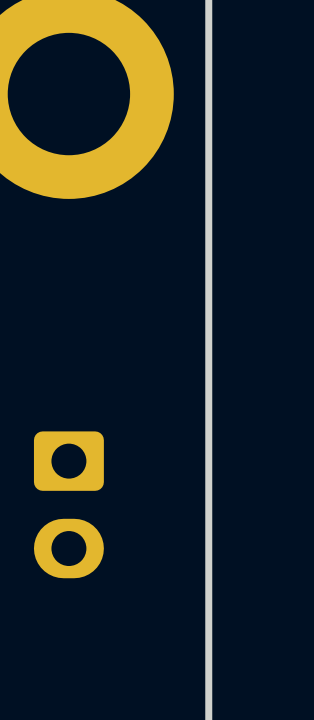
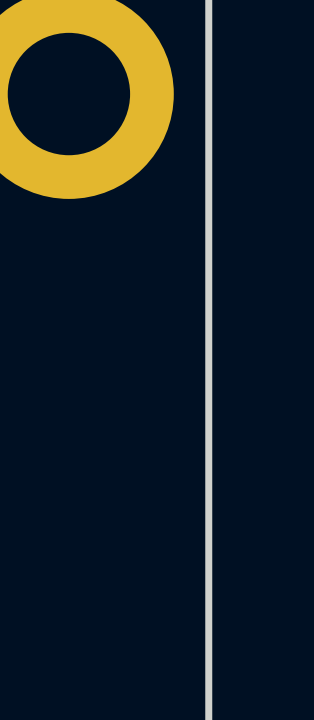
part: (68, 504) -> none

